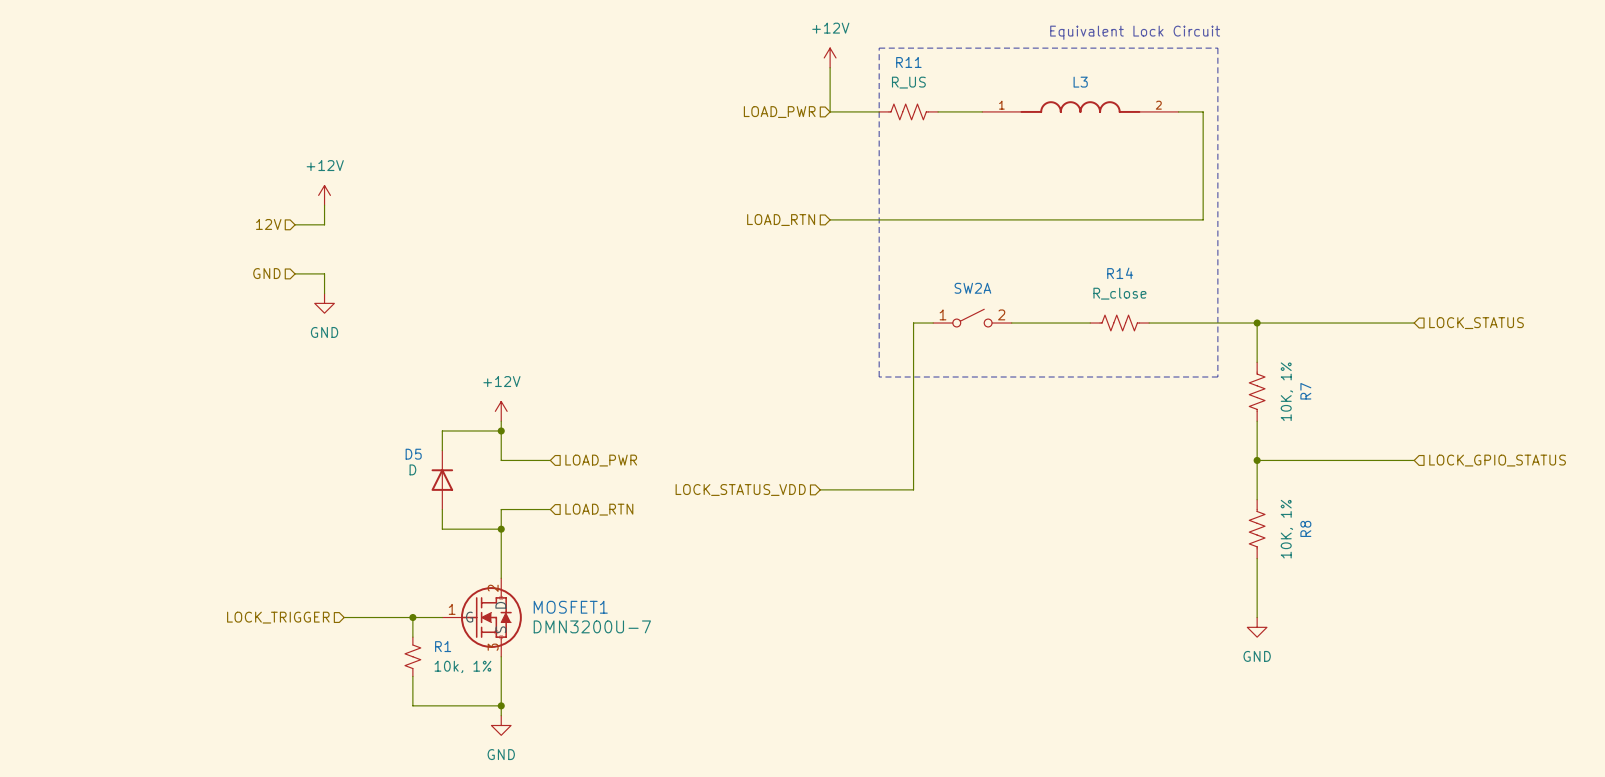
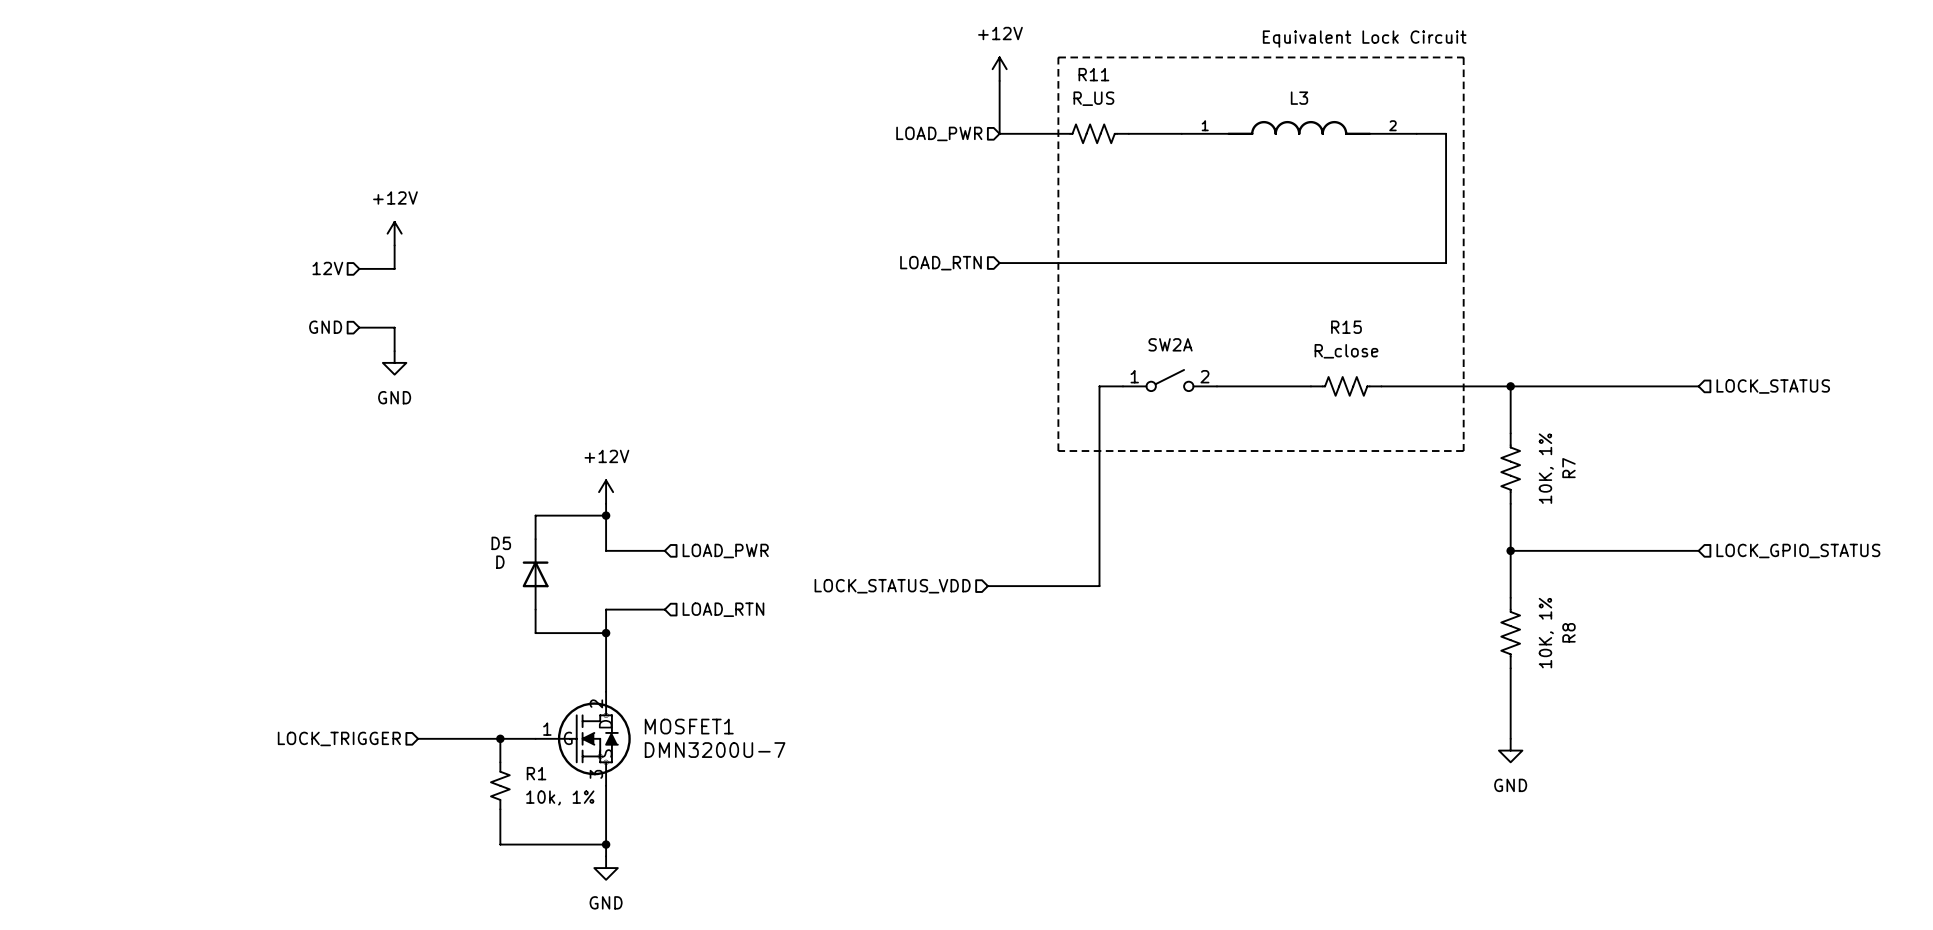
R14 name: R14 (1120, 273) -> R15 (1346, 327)

